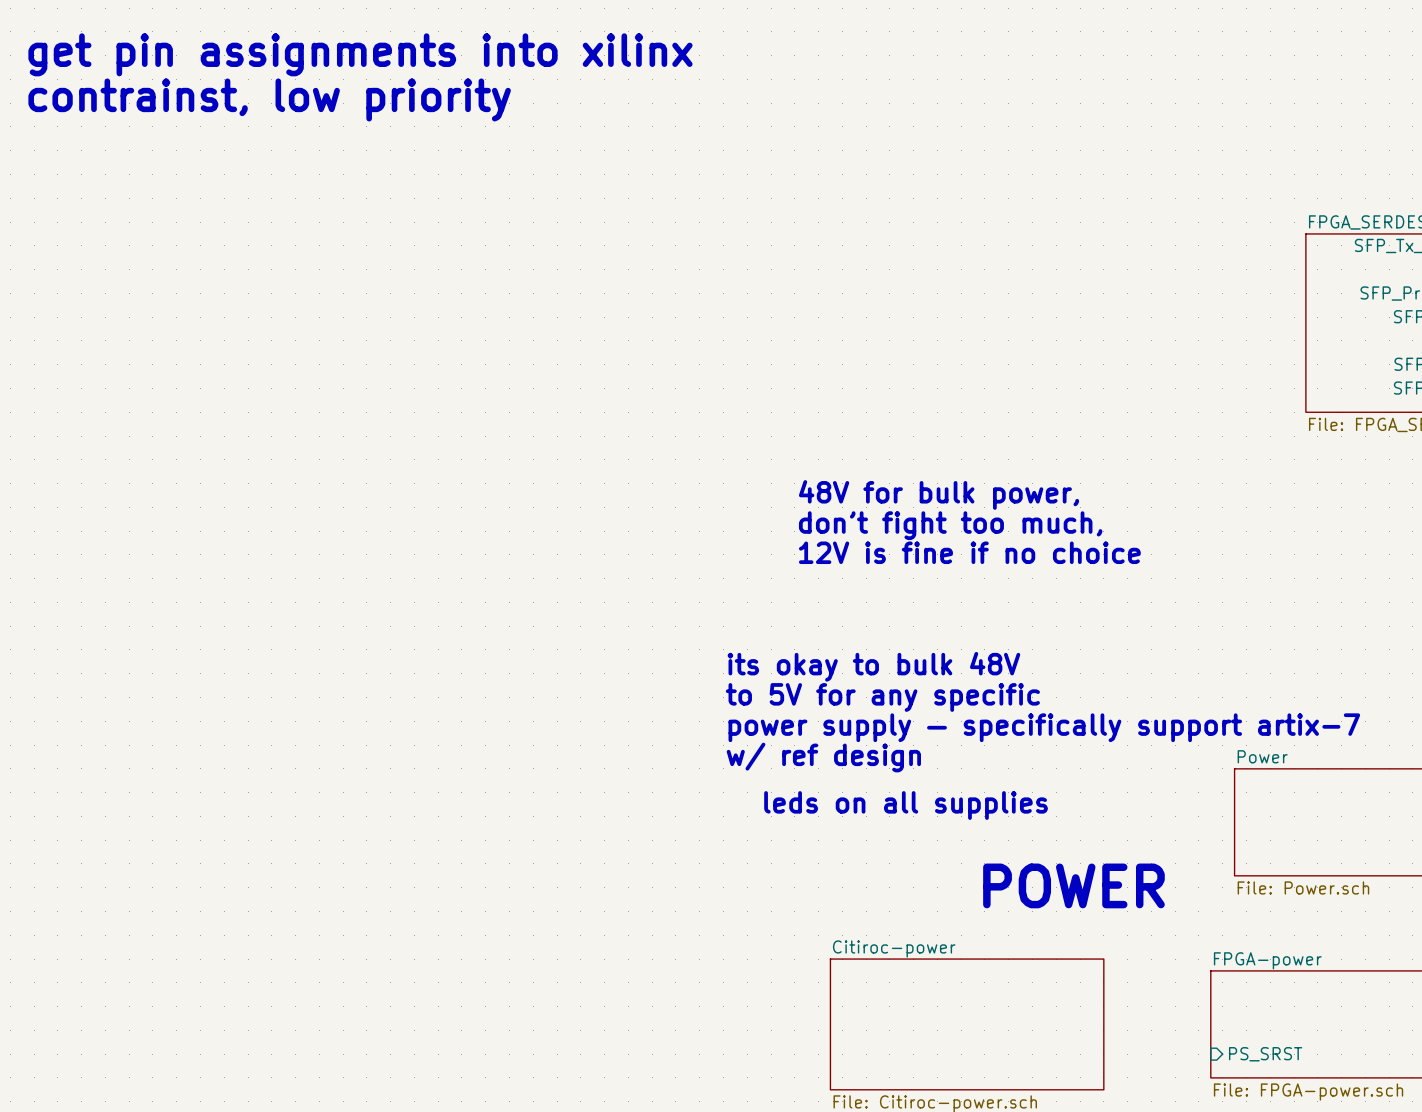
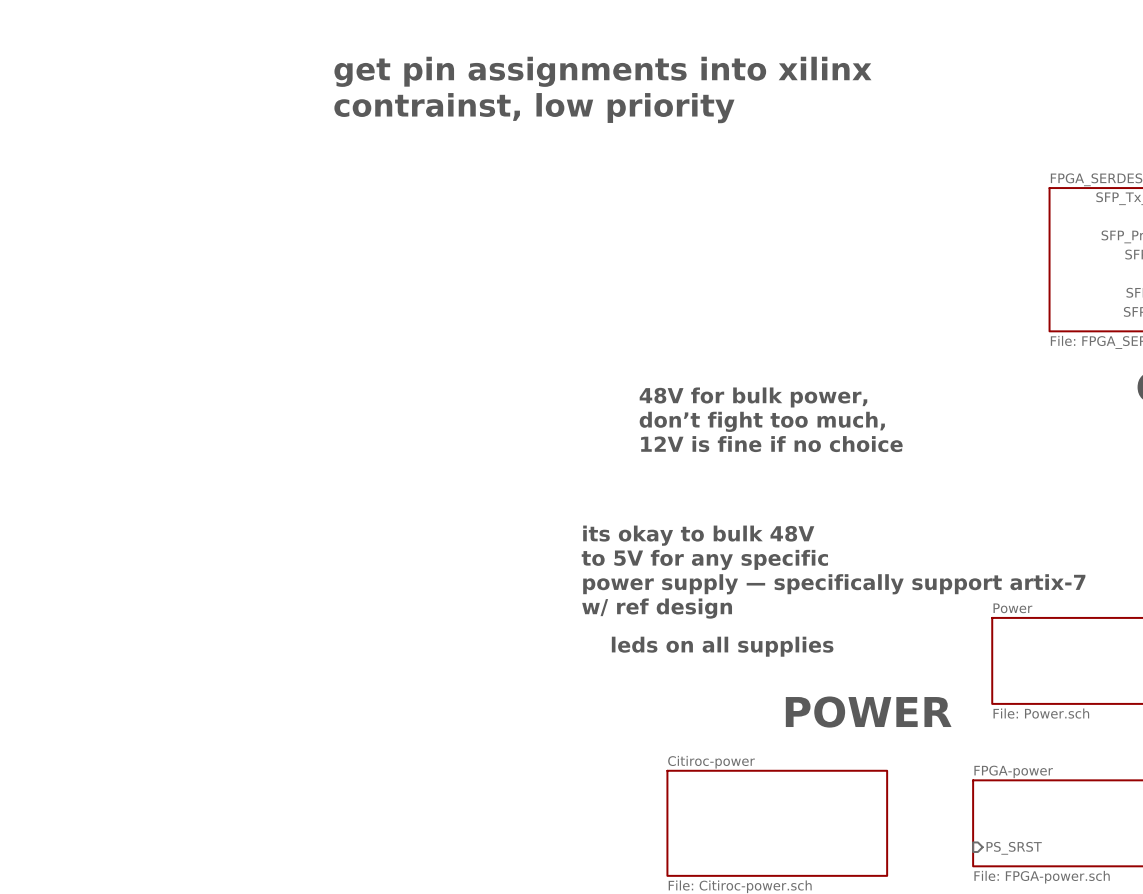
text: get pin assignments into xilinx (360, 54) -> none
text: none -> get pin assignments into xilinx (602, 71)
text: contrainst, low priority (269, 99) -> none
text: none -> contrainst, low priority (534, 108)

